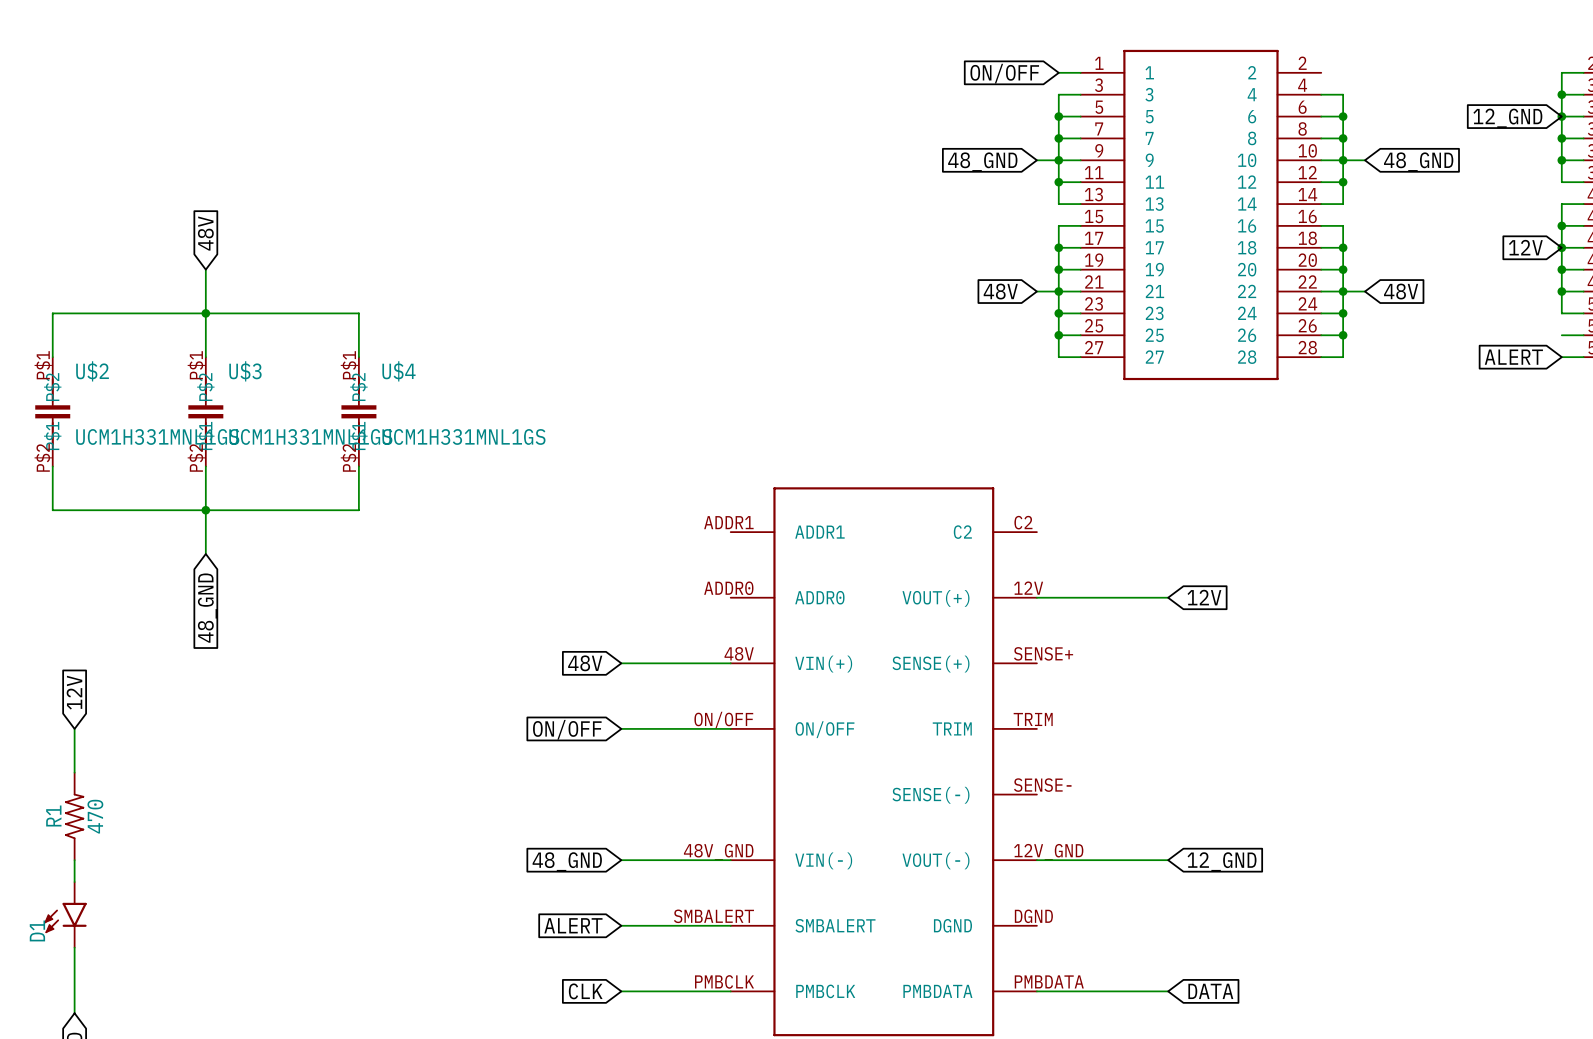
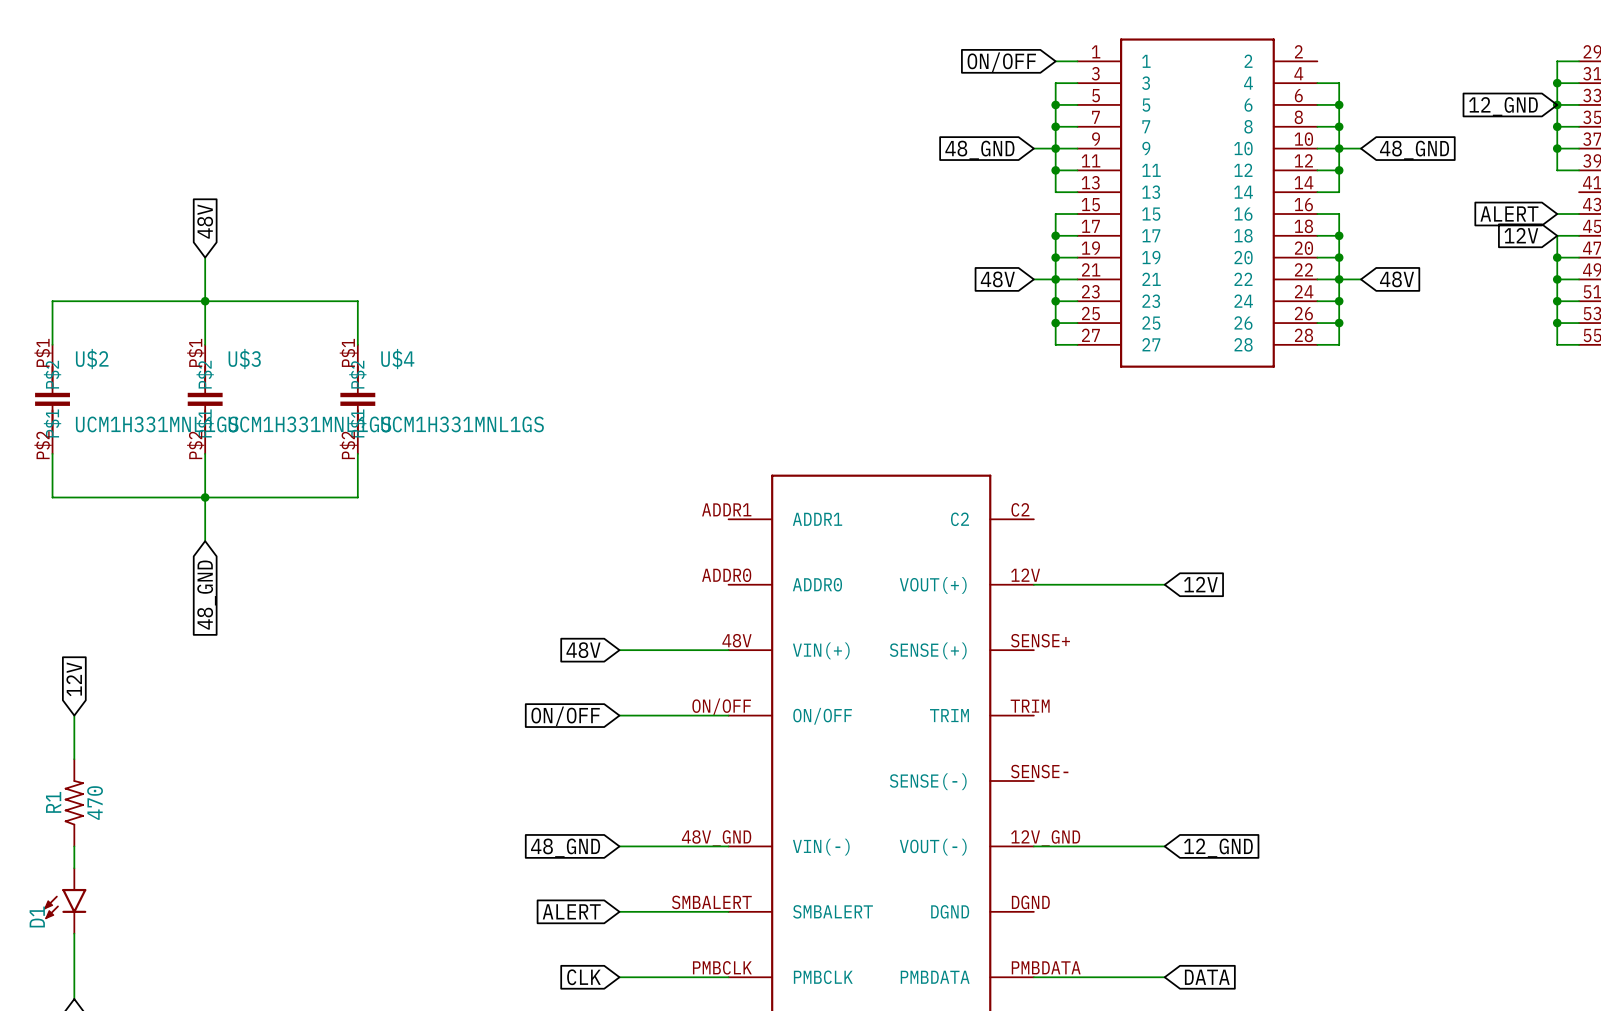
wire: (1583, 204) (1561, 204) (1561, 247) -> none
junction: (1561, 225) -> none
junction: (1561, 247) -> none
wire: none -> (1557, 301) (1557, 344)
junction: none -> (1557, 301)
junction: none -> (1557, 323)
global label position: ALERT (1513, 357) -> ALERT (1509, 214)

